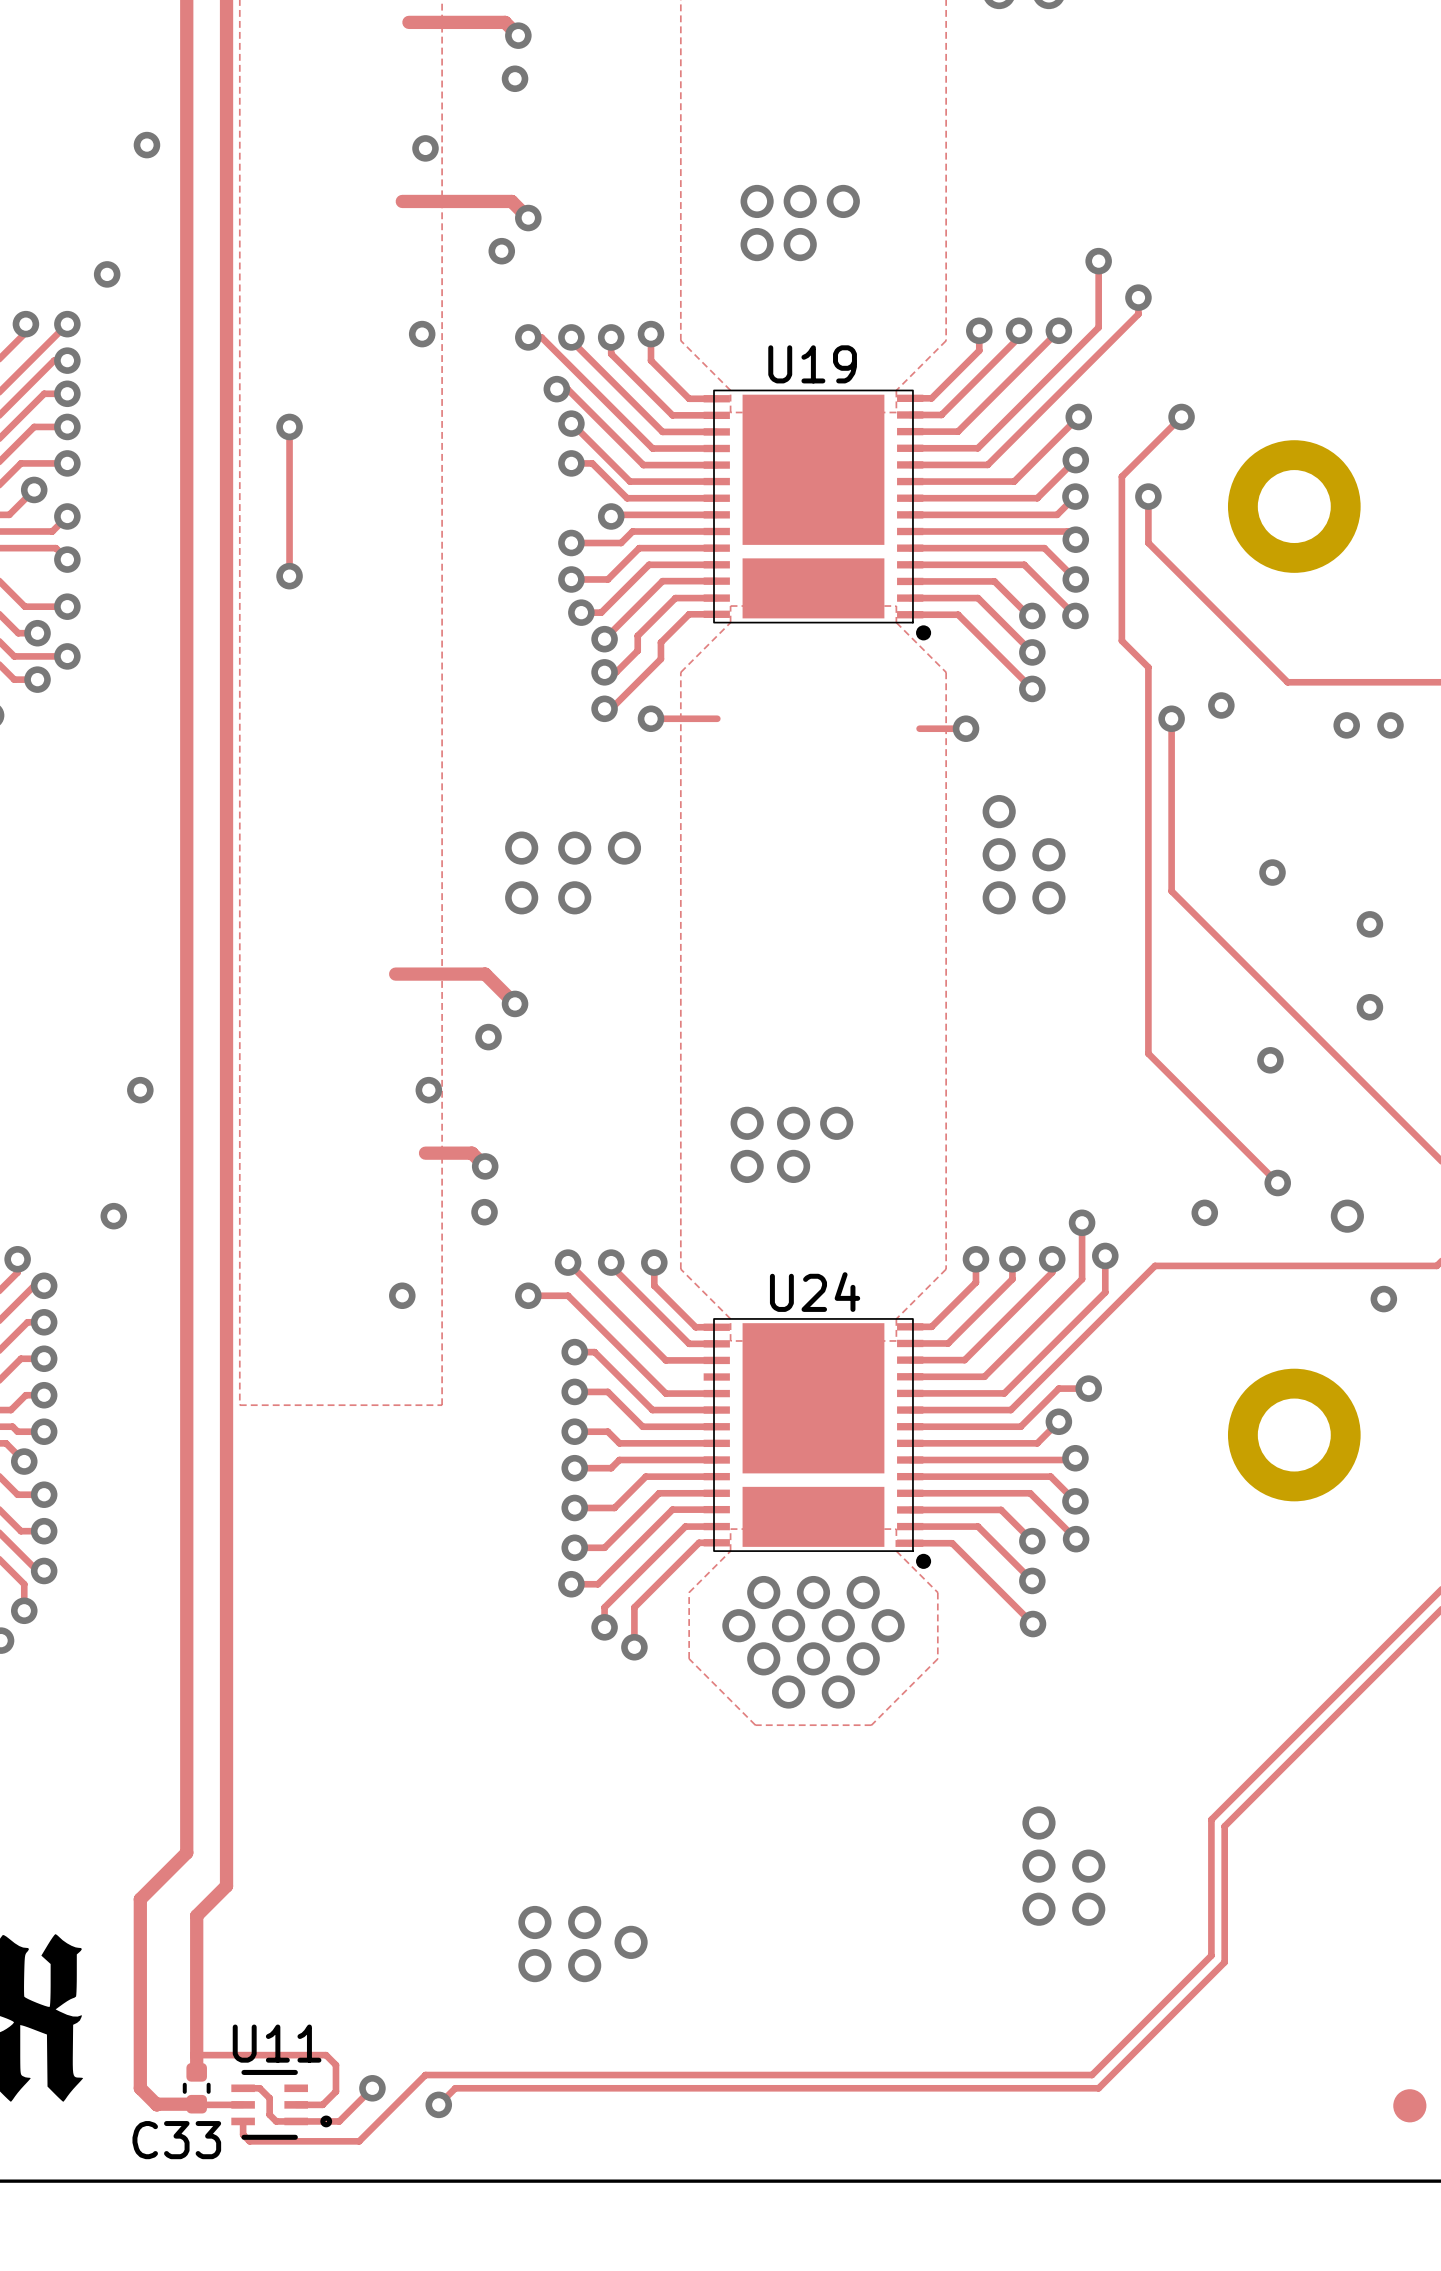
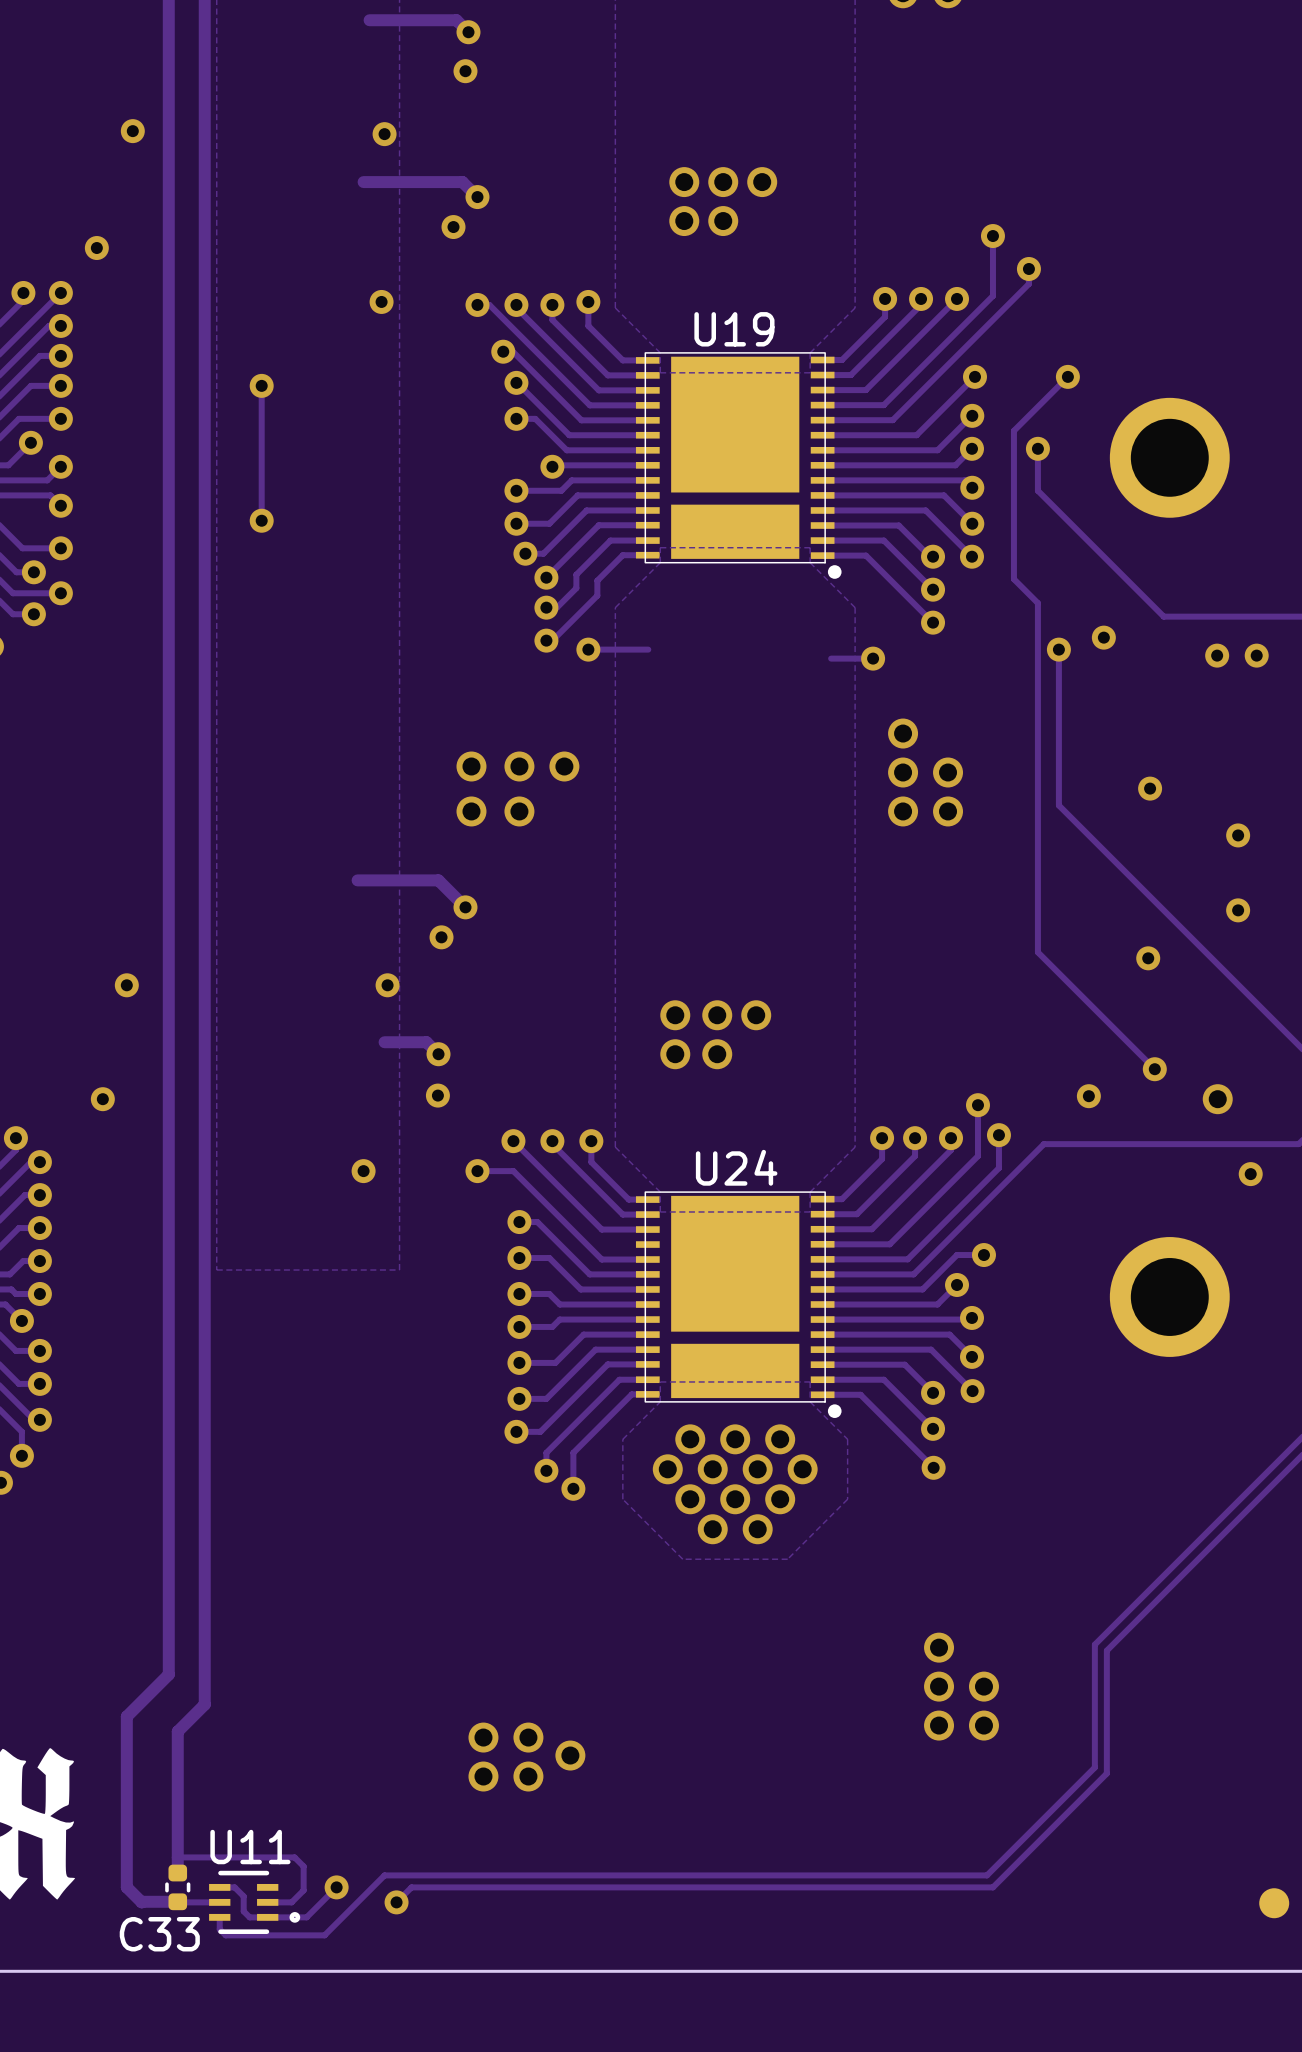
part footprint: [1227, 440, 1361, 573] -> [1109, 397, 1230, 518]
part footprint: [1227, 1368, 1361, 1502] -> [1109, 1237, 1230, 1357]

